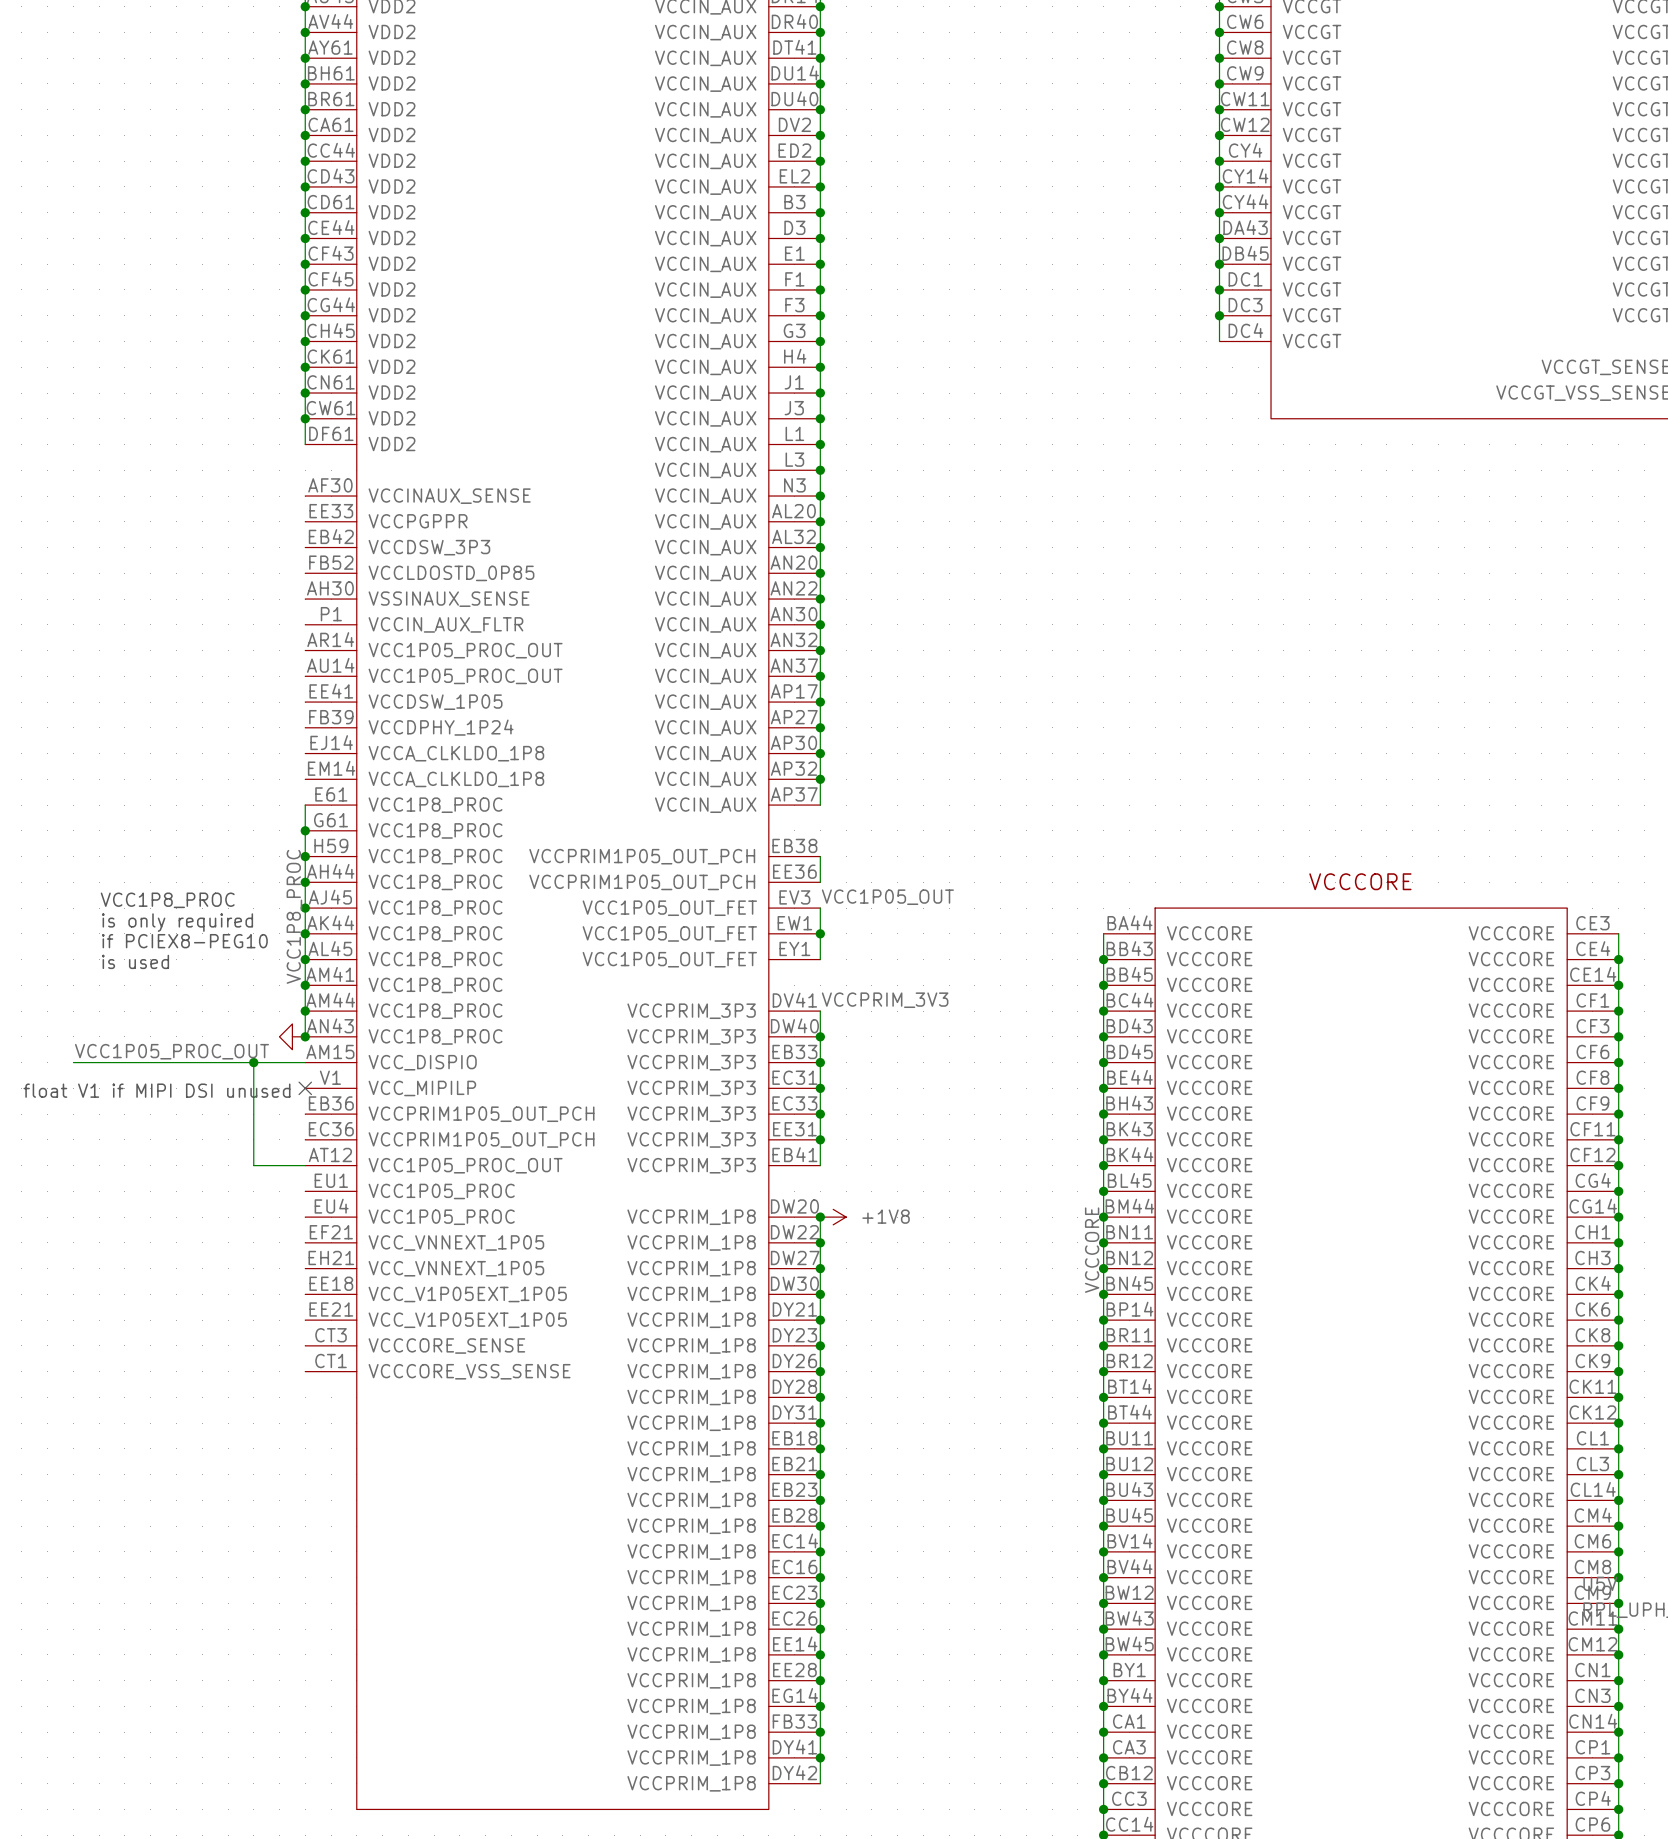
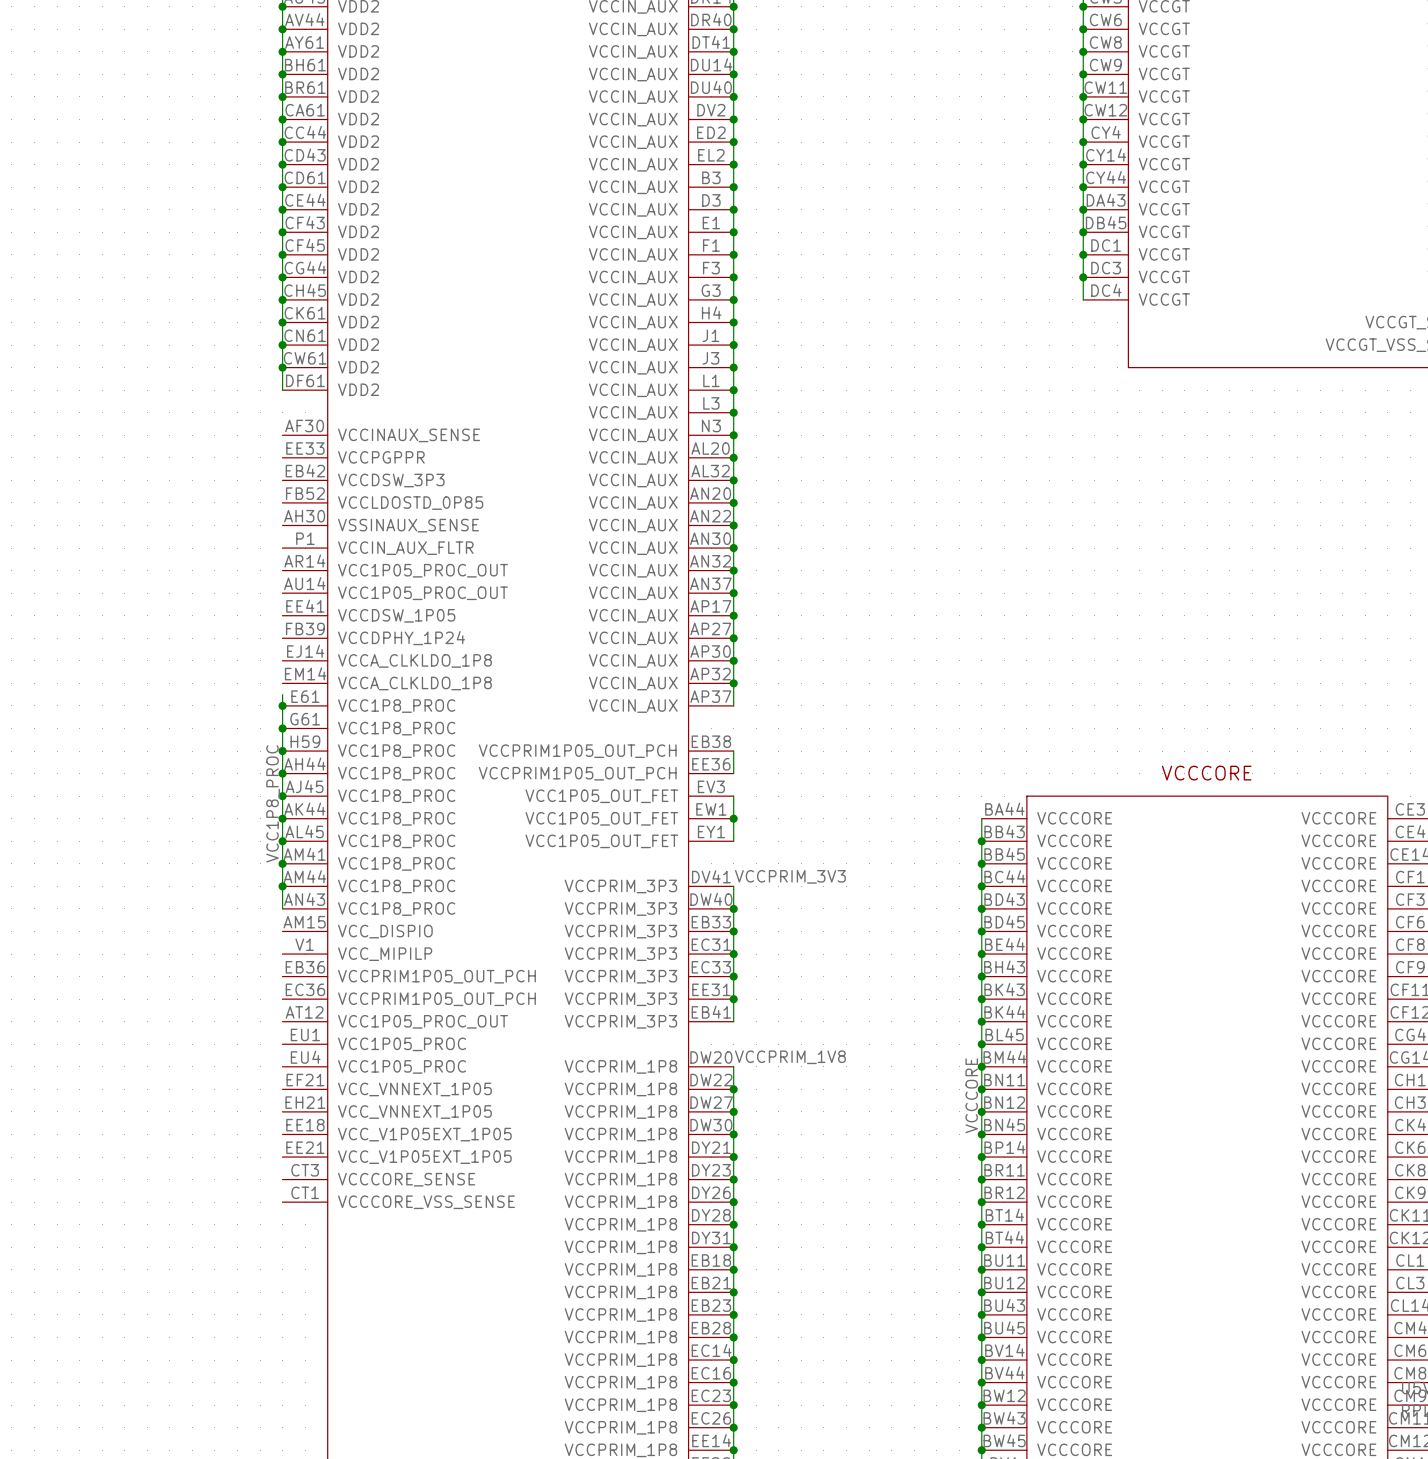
wire: none -> (282, 694) (282, 705)
junction: none -> (282, 705)
label: VCC1P05_OUT (887, 897) -> none
text: VCC1P8_PROC (167, 900) -> none
text: is only required (177, 922) -> none
text: if PCIEX8-PEG10 (184, 941) -> none
text: is used (135, 961) -> none
power symbol: (292, 1036) -> none
junction: (305, 1036) -> none
label: VCC1P05_PROC_OUT (172, 1051) -> none
wire: (73, 1062) (305, 1062) -> none
wire: (253, 1062) (253, 1165) (305, 1165) -> none
junction: (253, 1062) -> none
no-connect mark: (305, 1088) -> none
text: float V1 if MIPI DSI unused (156, 1090) -> none
label: none -> VCCPRIM_1V8 (790, 1057)
junction: (820, 1217) -> none
power symbol: +1V8 (833, 1217) -> none

